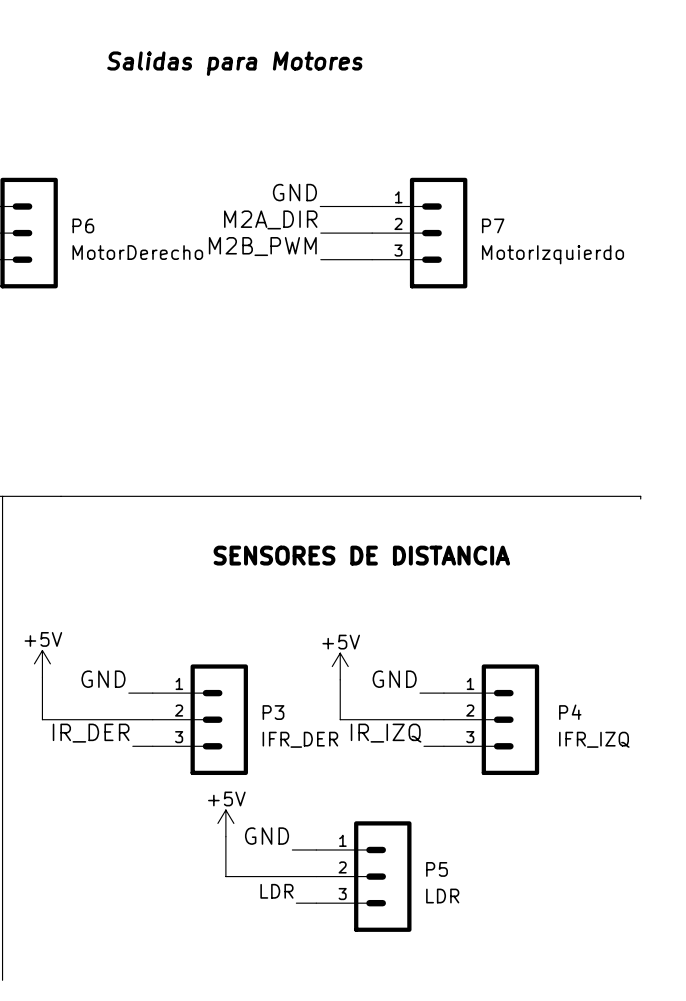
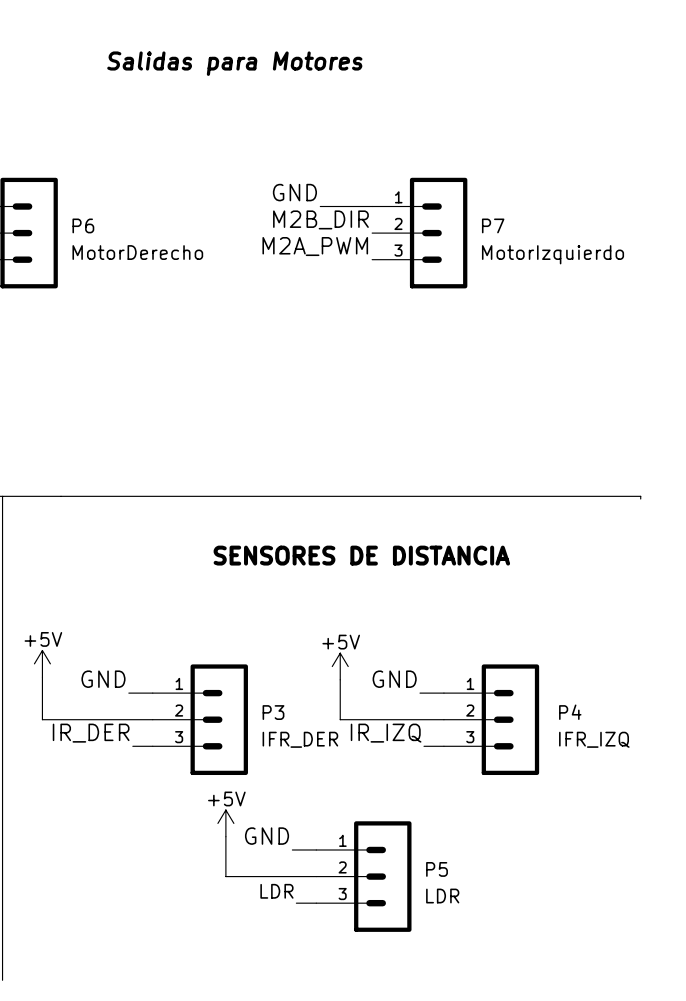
label: M2A_DIR (270, 219) -> M2B_DIR (320, 219)
wire: (320, 233) (372, 233) -> none
label: M2B_PWM (262, 246) -> M2A_PWM (315, 246)
wire: (320, 259) (372, 259) -> none

